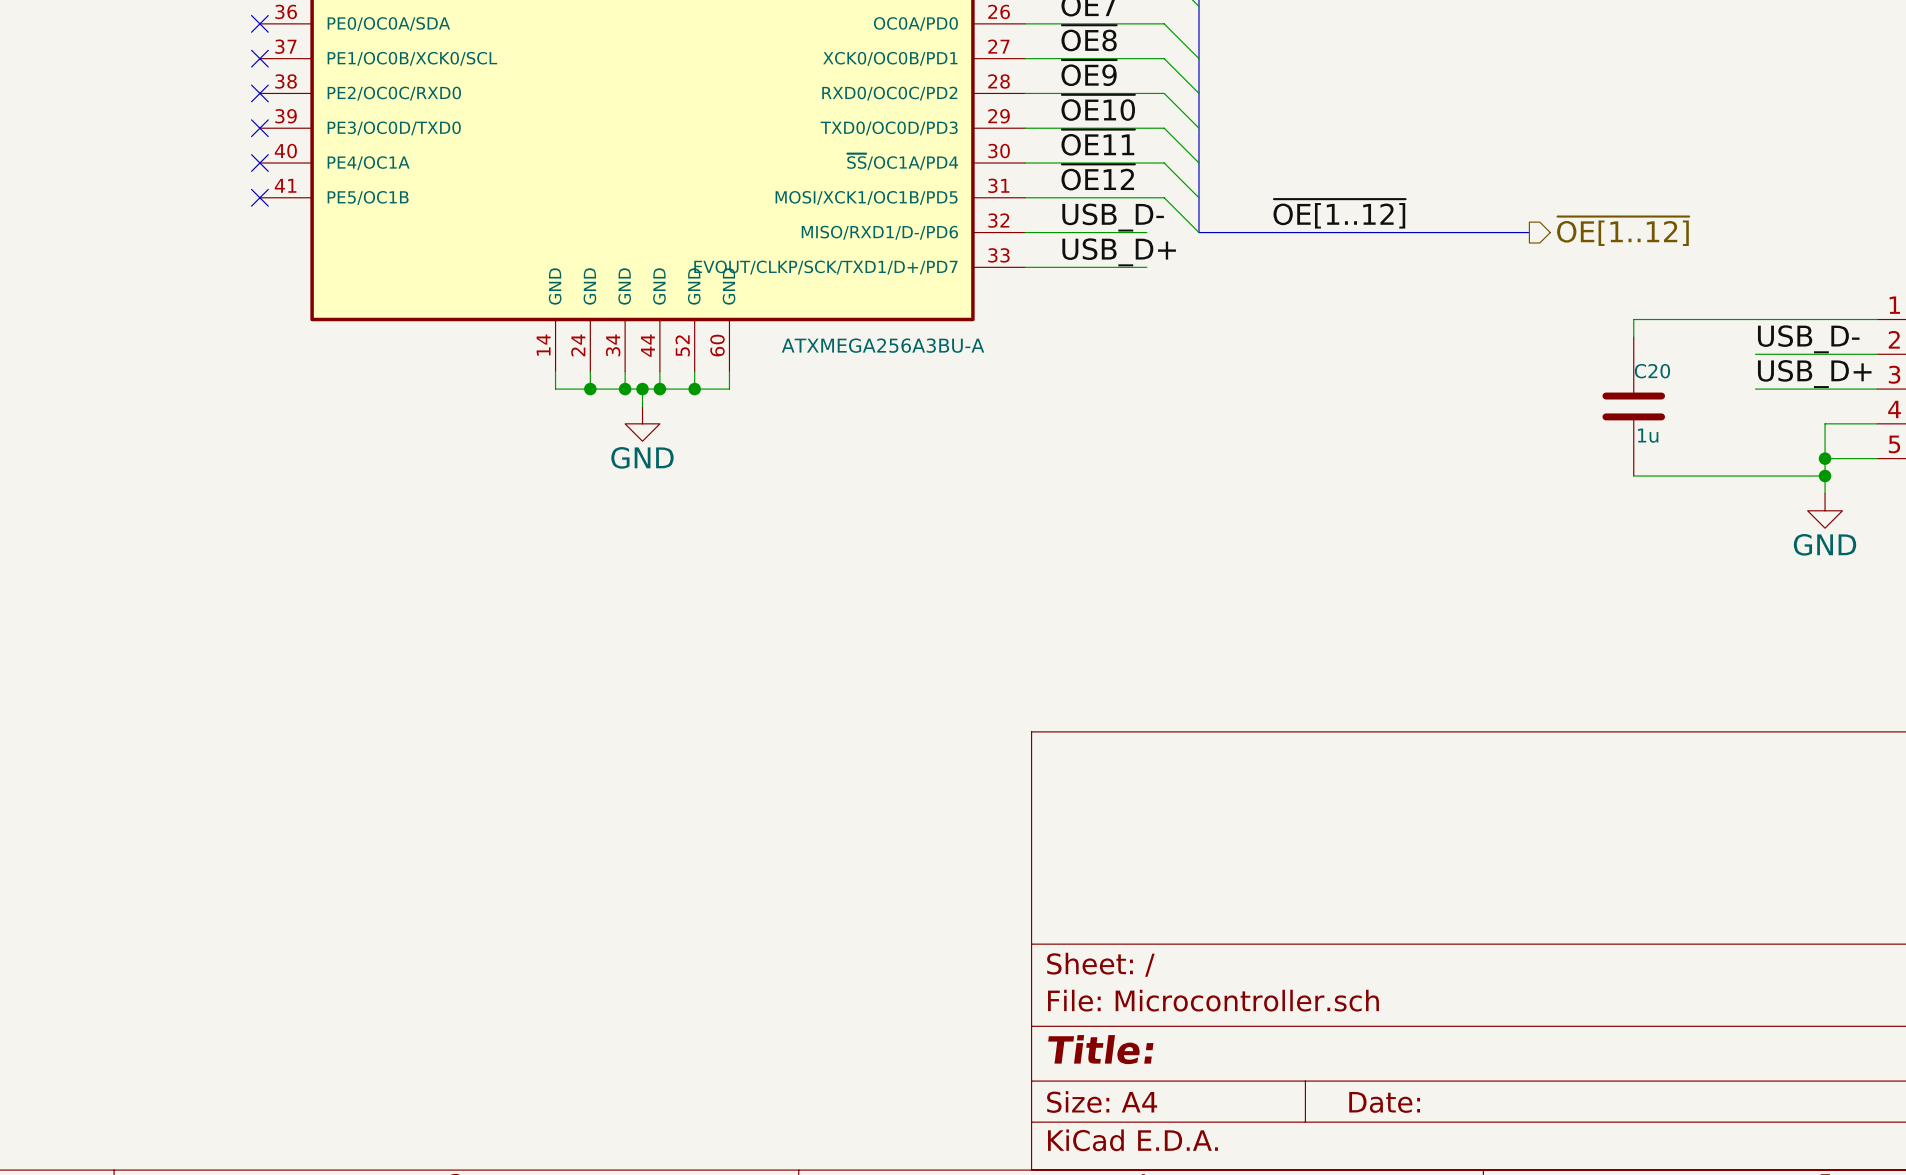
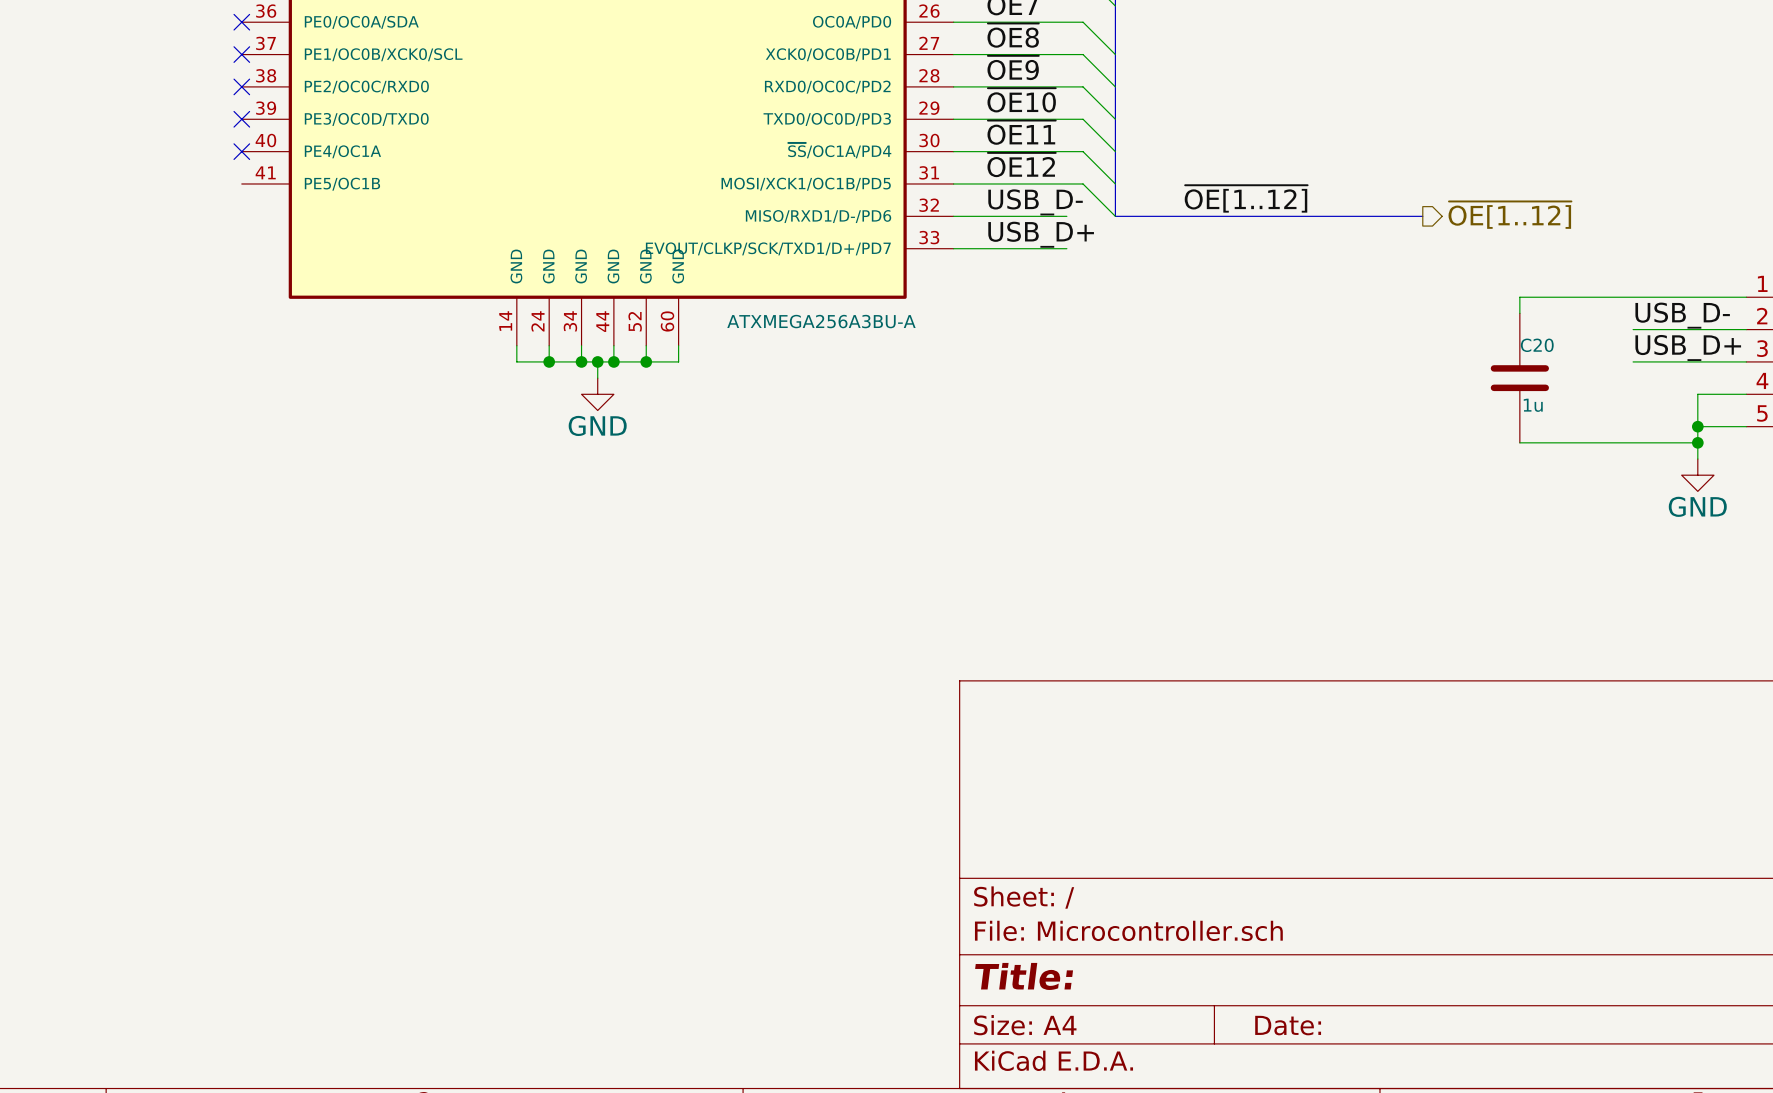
no-connect mark: (259, 197) -> none

